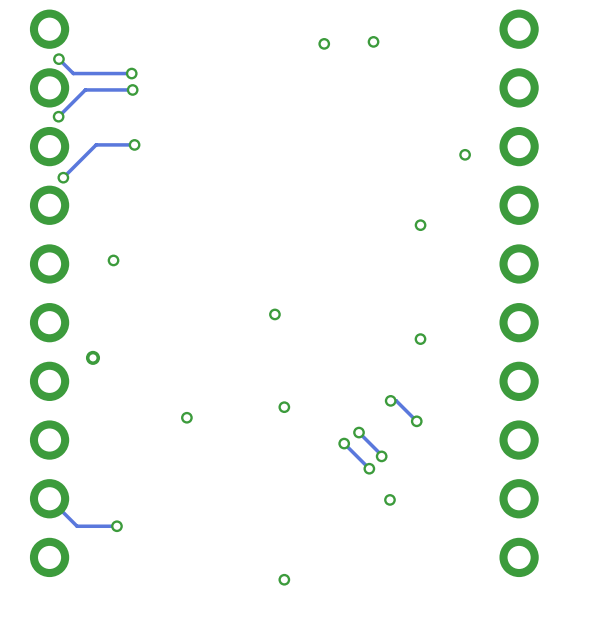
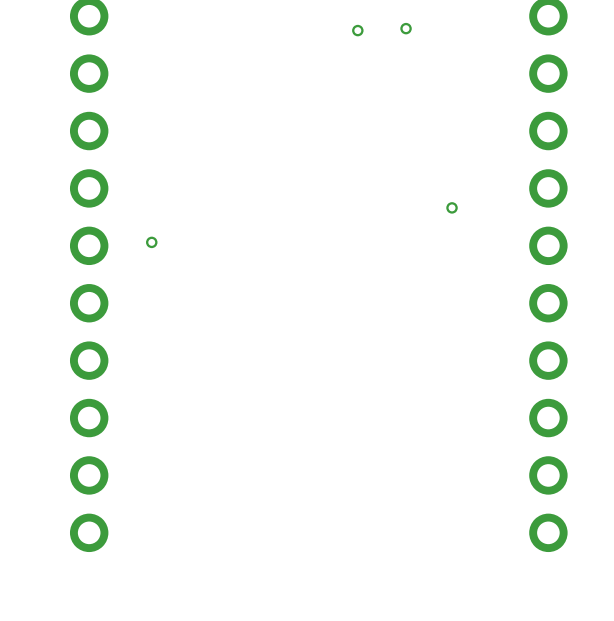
track: (58, 59) (73, 73) (131, 73) -> none
via: (58, 59) -> none
via: (131, 73) -> none
track: (132, 89) (85, 89) (58, 116) -> none
via: (132, 89) -> none
via: (58, 116) -> none
track: (134, 144) (96, 144) (63, 177) -> none
via: (134, 144) -> none
via: (465, 154) -> none
via: (63, 177) -> none
via: (274, 314) -> none
via: (420, 339) -> none
via: (92, 357) -> none
track: (390, 400) (396, 400) (416, 421) -> none
via: (390, 400) -> none
via: (284, 407) -> none
via: (186, 417) -> none
via: (416, 421) -> none
track: (359, 432) (381, 456) -> none
via: (359, 432) -> none
track: (344, 443) (369, 468) -> none
via: (344, 443) -> none
via: (381, 456) -> none
via: (369, 468) -> none
track: (49, 498) (77, 526) (116, 526) -> none
via: (389, 499) -> none
via: (116, 526) -> none
via: (284, 579) -> none

